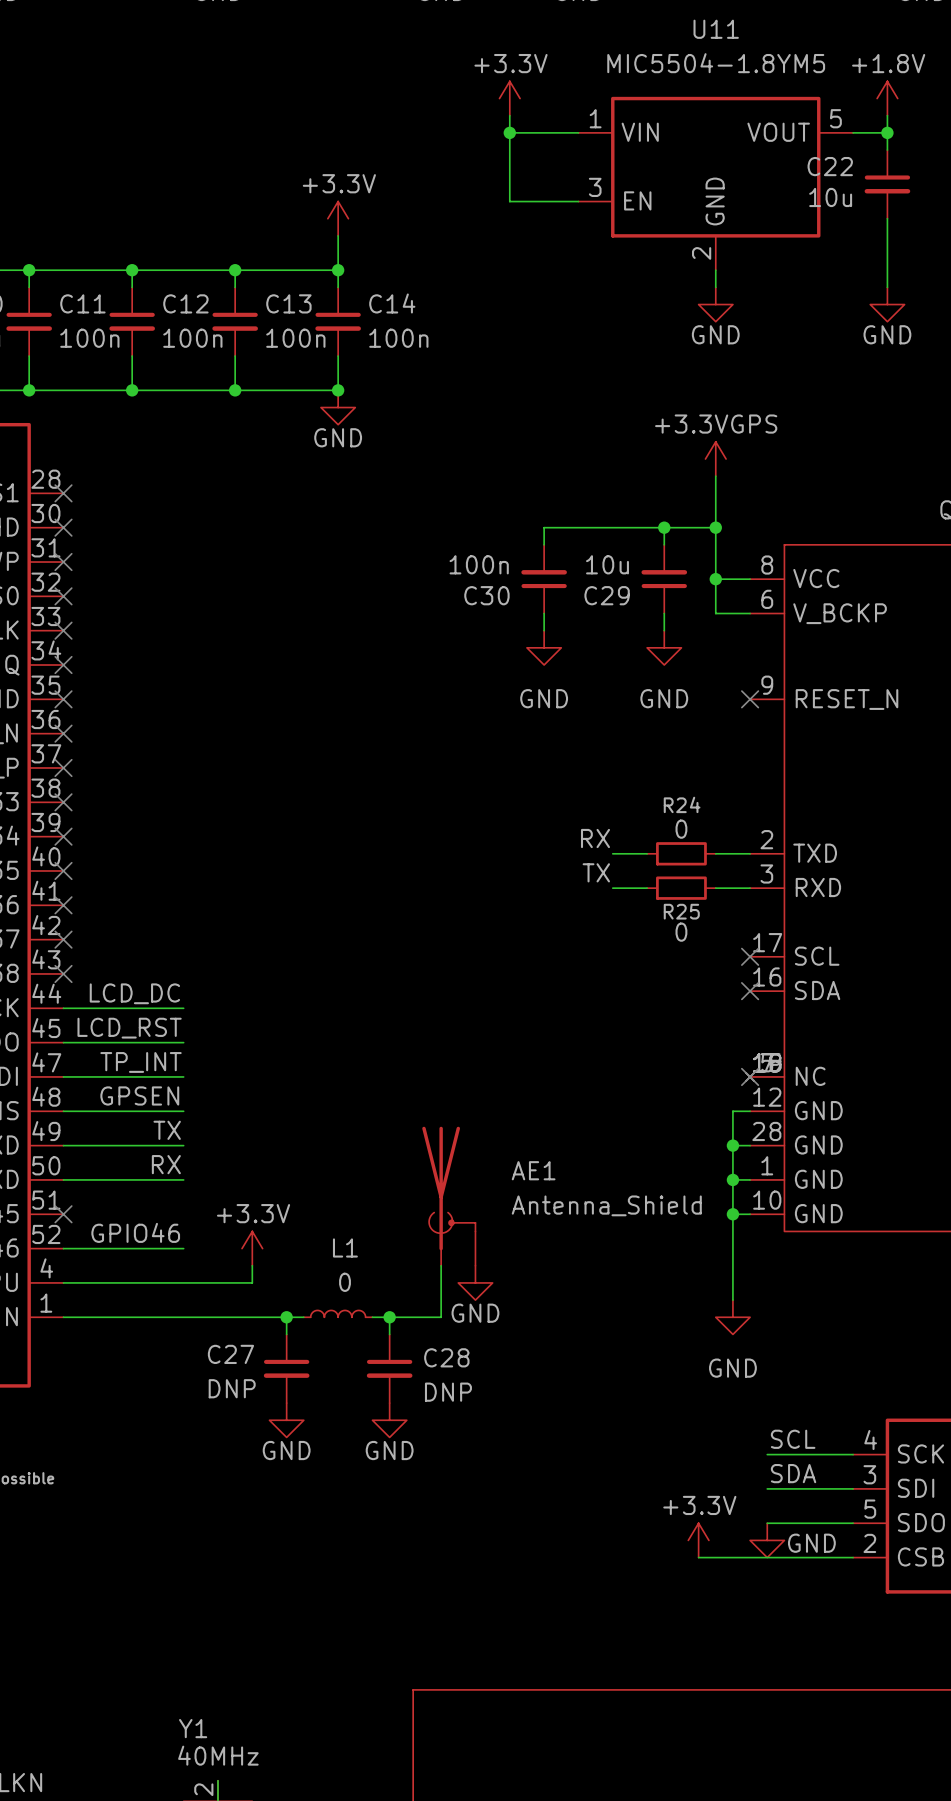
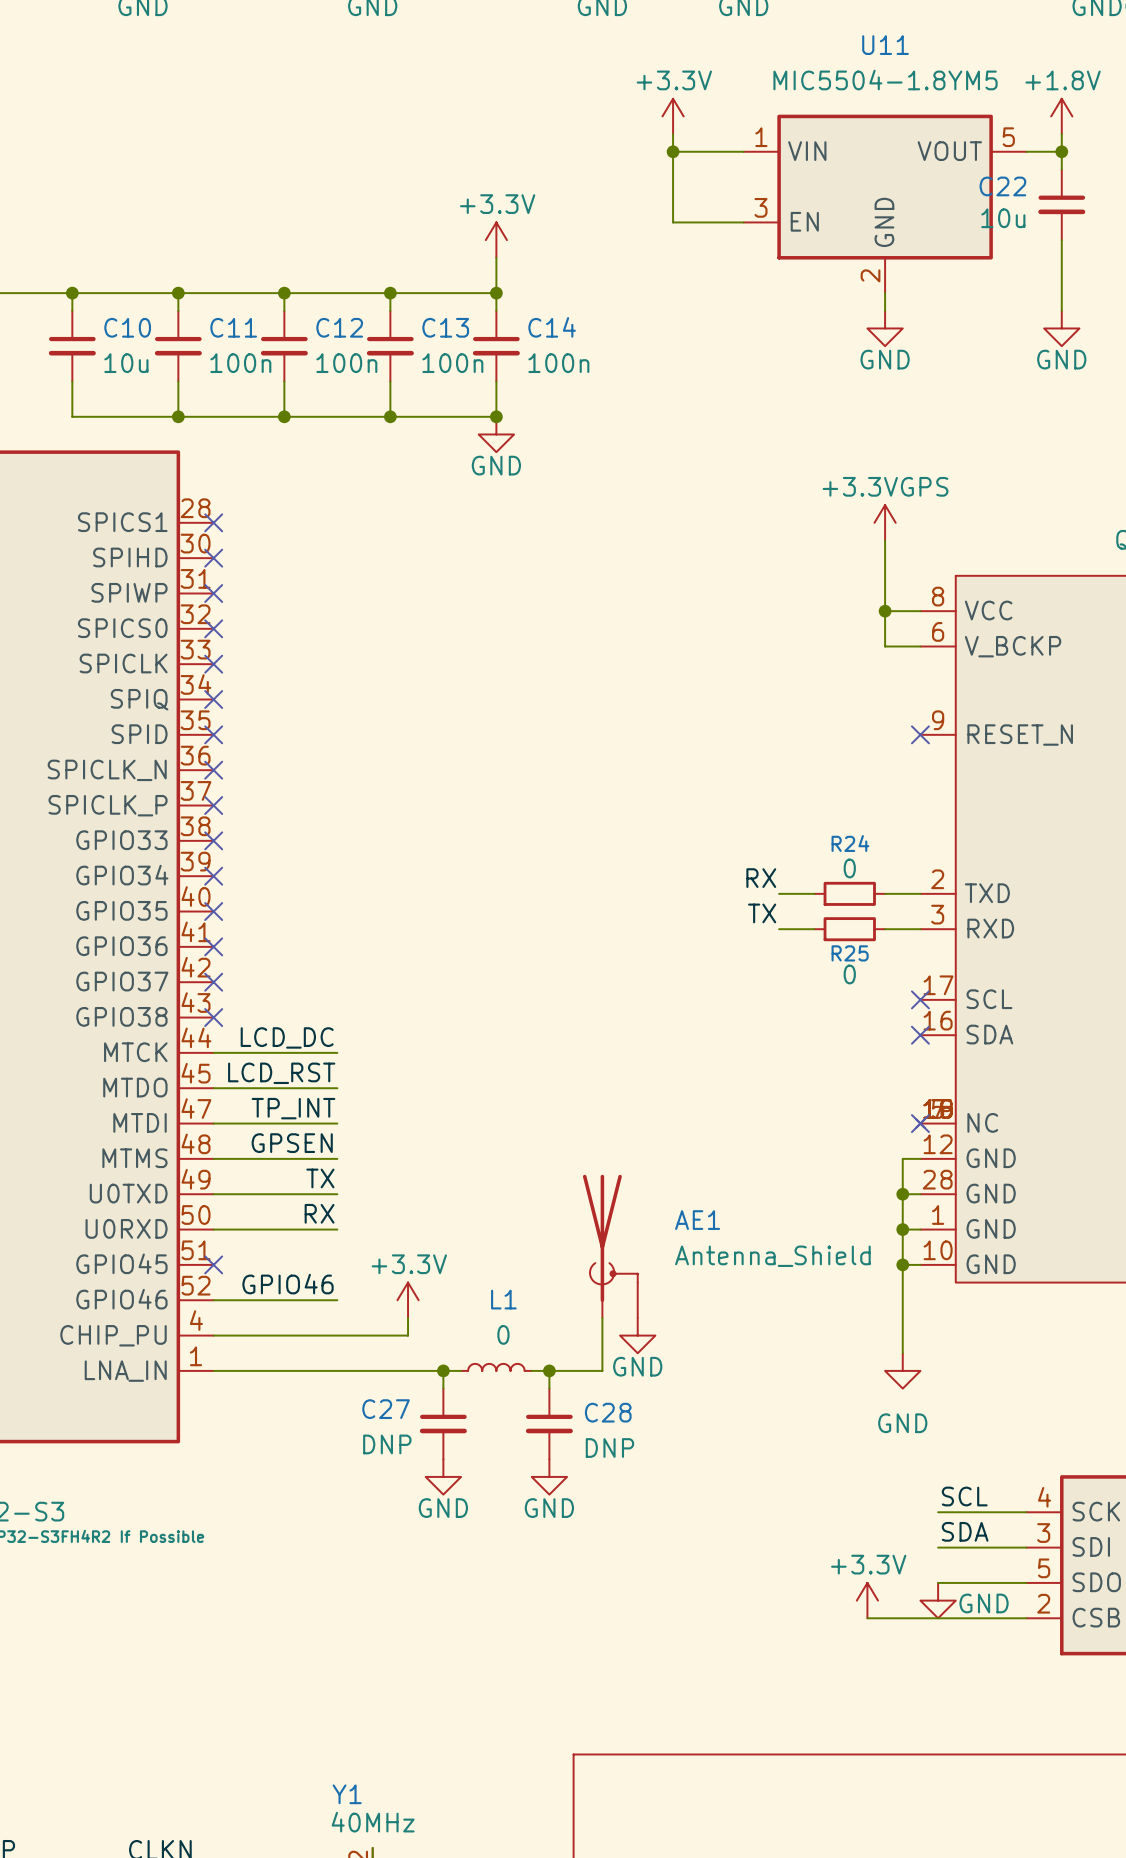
power symbol position: +3.3VGPS (715, 459) -> +3.3VGPS (885, 522)
wire: (664, 527) (664, 544) -> none
junction: (664, 527) -> none
wire: (715, 527) (544, 527) (544, 544) -> none
junction: (715, 527) -> none
C30: 100n (544, 579) -> none
C29: 10u (664, 579) -> none
wire: (544, 613) (544, 630) -> none
wire: (664, 613) (664, 630) -> none
power symbol: GND (544, 647) -> none
power symbol: GND (664, 647) -> none

